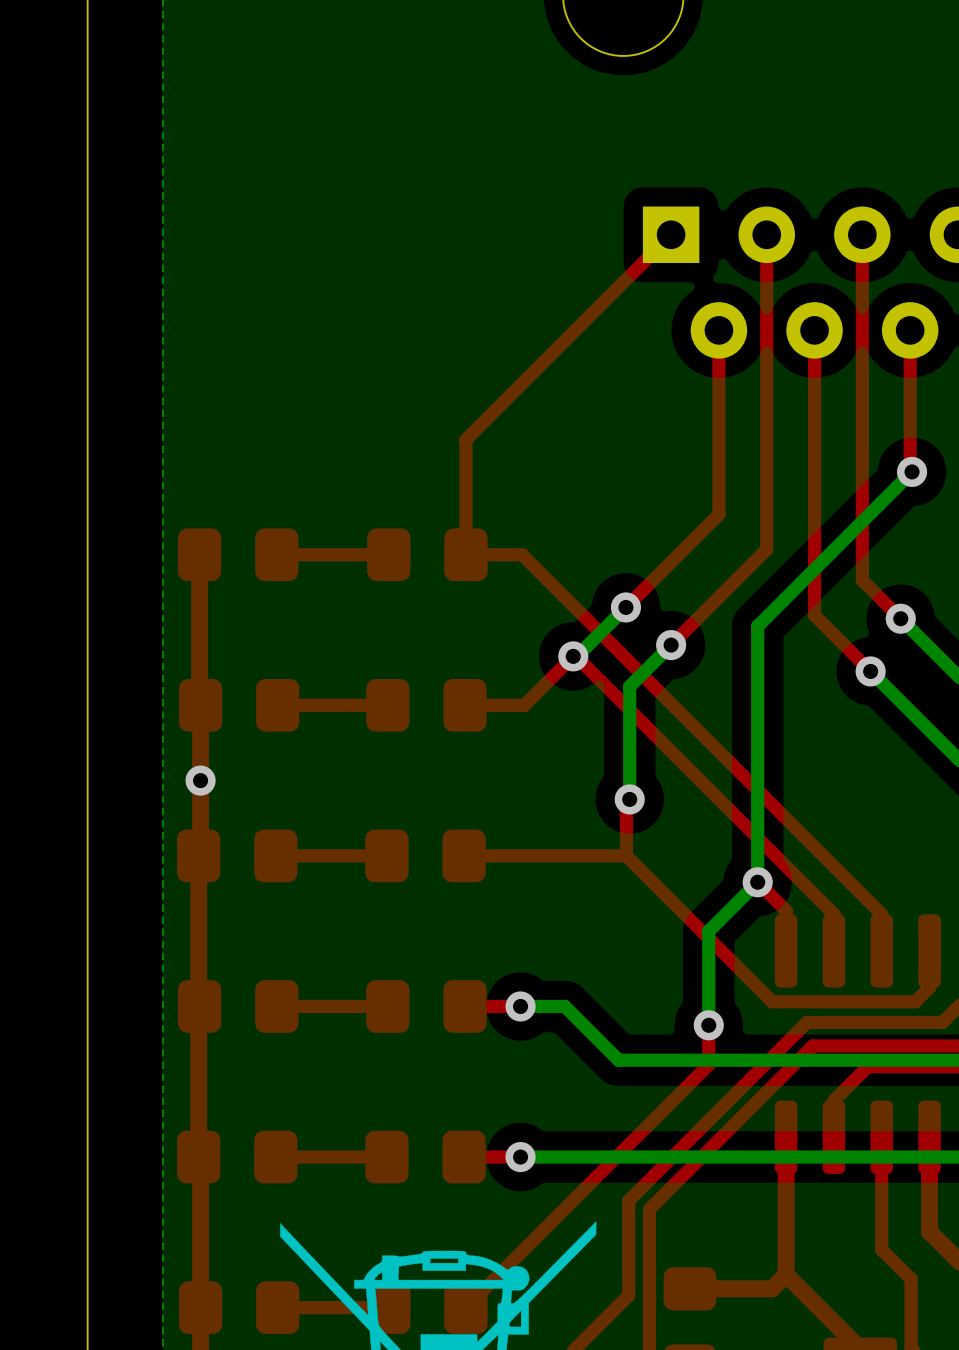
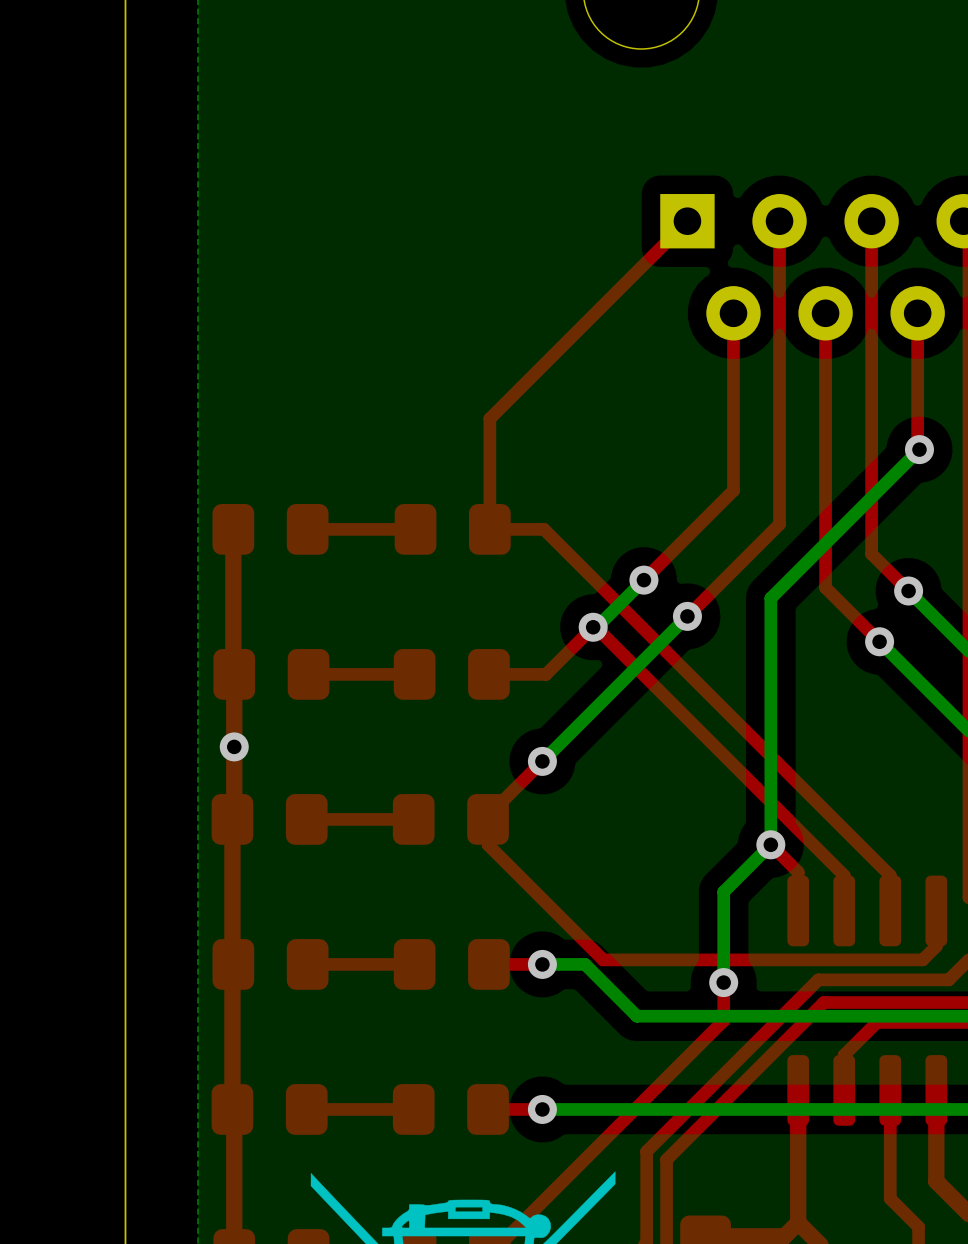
bottom track: (629, 686) (629, 799) -> (647, 656) (542, 761)
top track: none -> (542, 761) (488, 815)
top track: (629, 799) (626, 802) (626, 855) -> none
via position: (629, 799) -> (542, 761)
top track: (626, 855) (772, 1001) -> (488, 819) (488, 844) (603, 959) (784, 959)
top track: (626, 855) (464, 855) -> none

